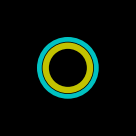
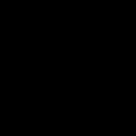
part: (67, 67) -> none

